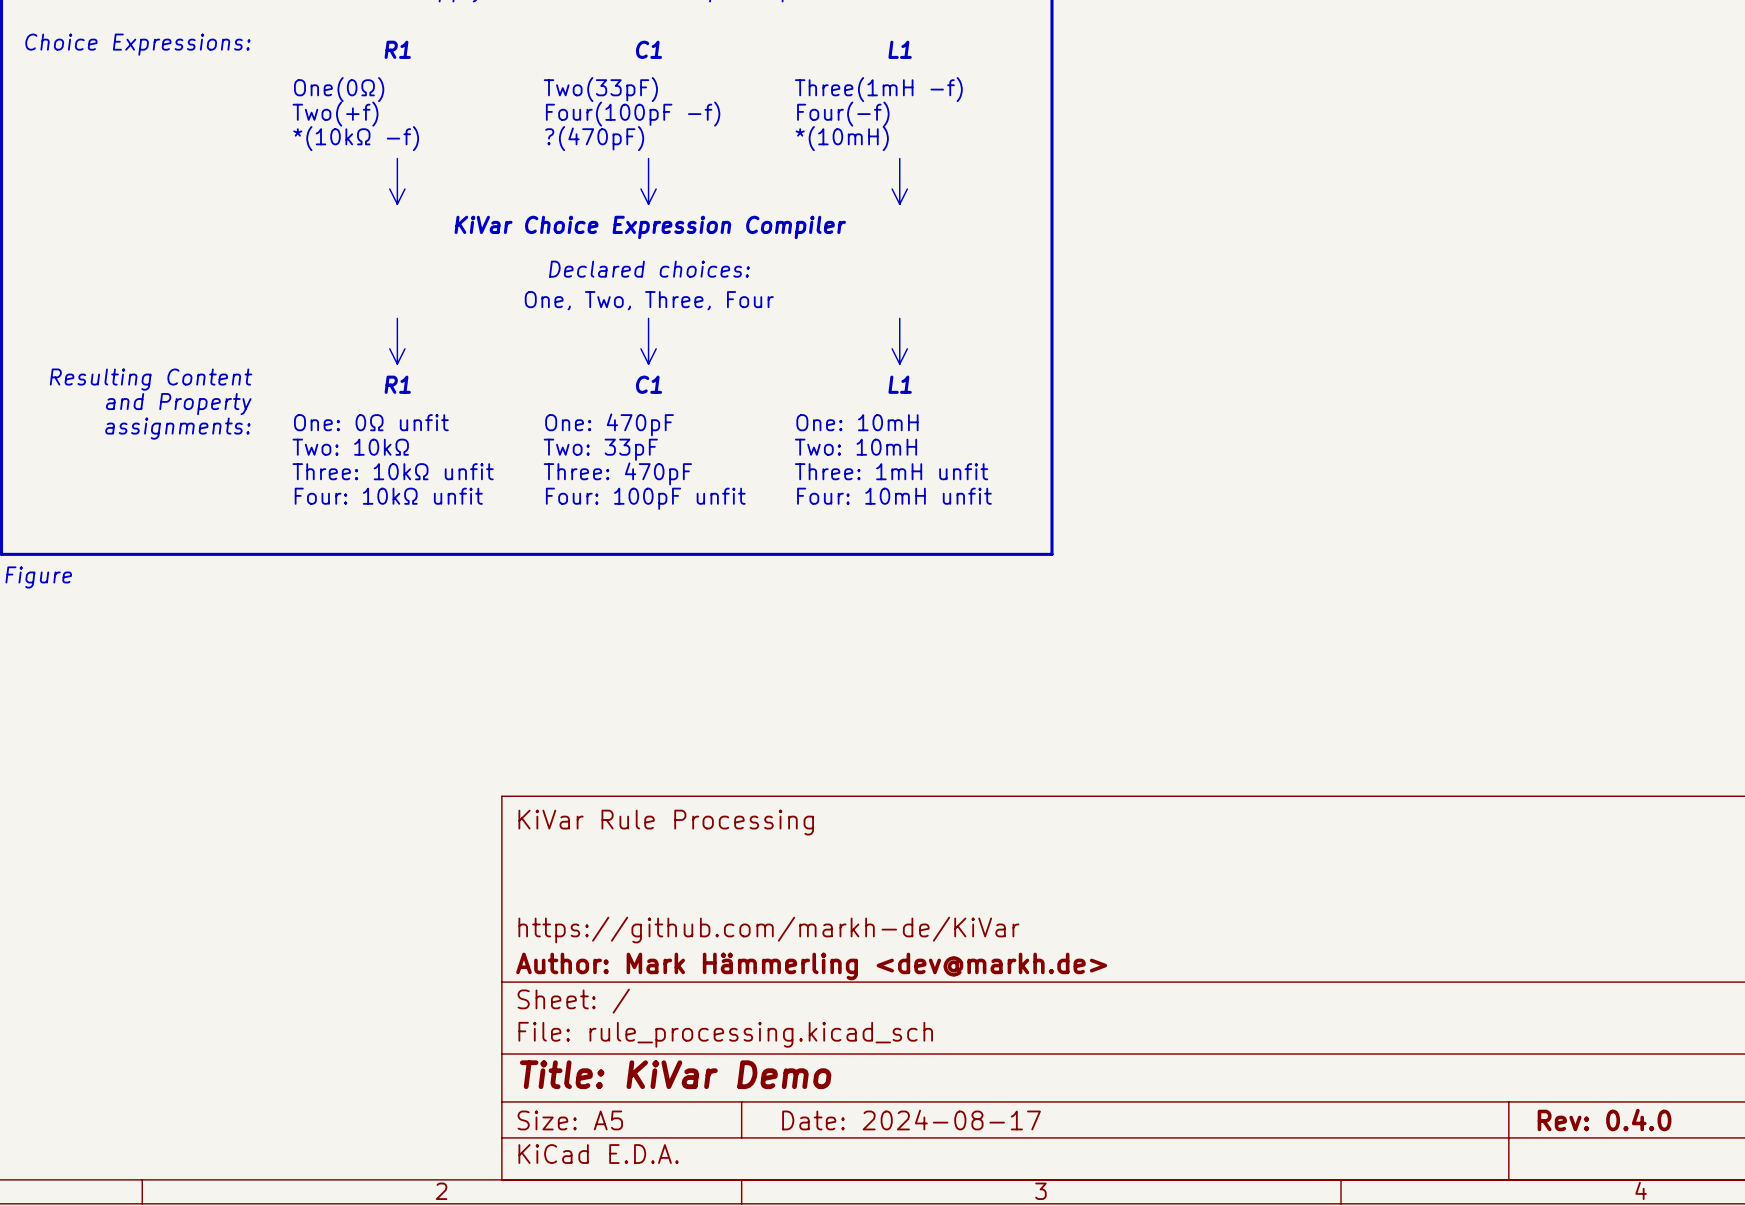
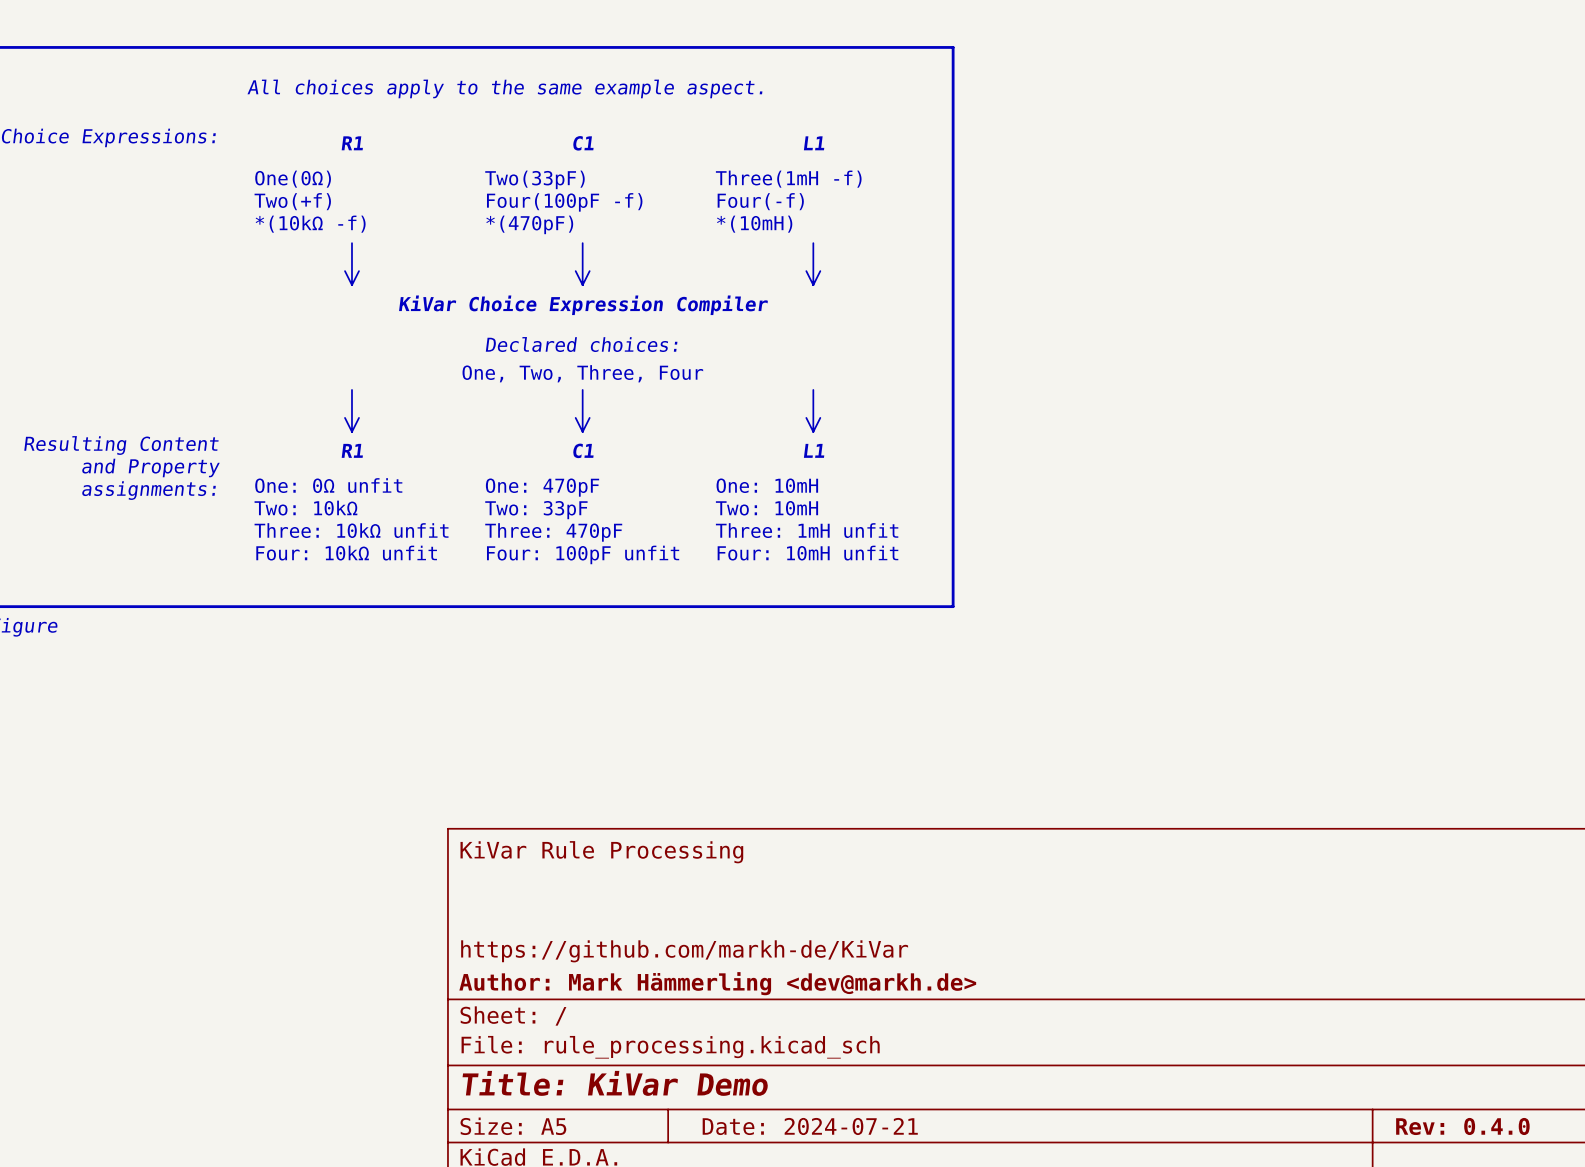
text: ?(470pF) (594, 138) -> *(470pF) (529, 224)
title block: Date: 2024-08-17 (911, 1120) -> Date: 2024-07-21 (810, 1126)

